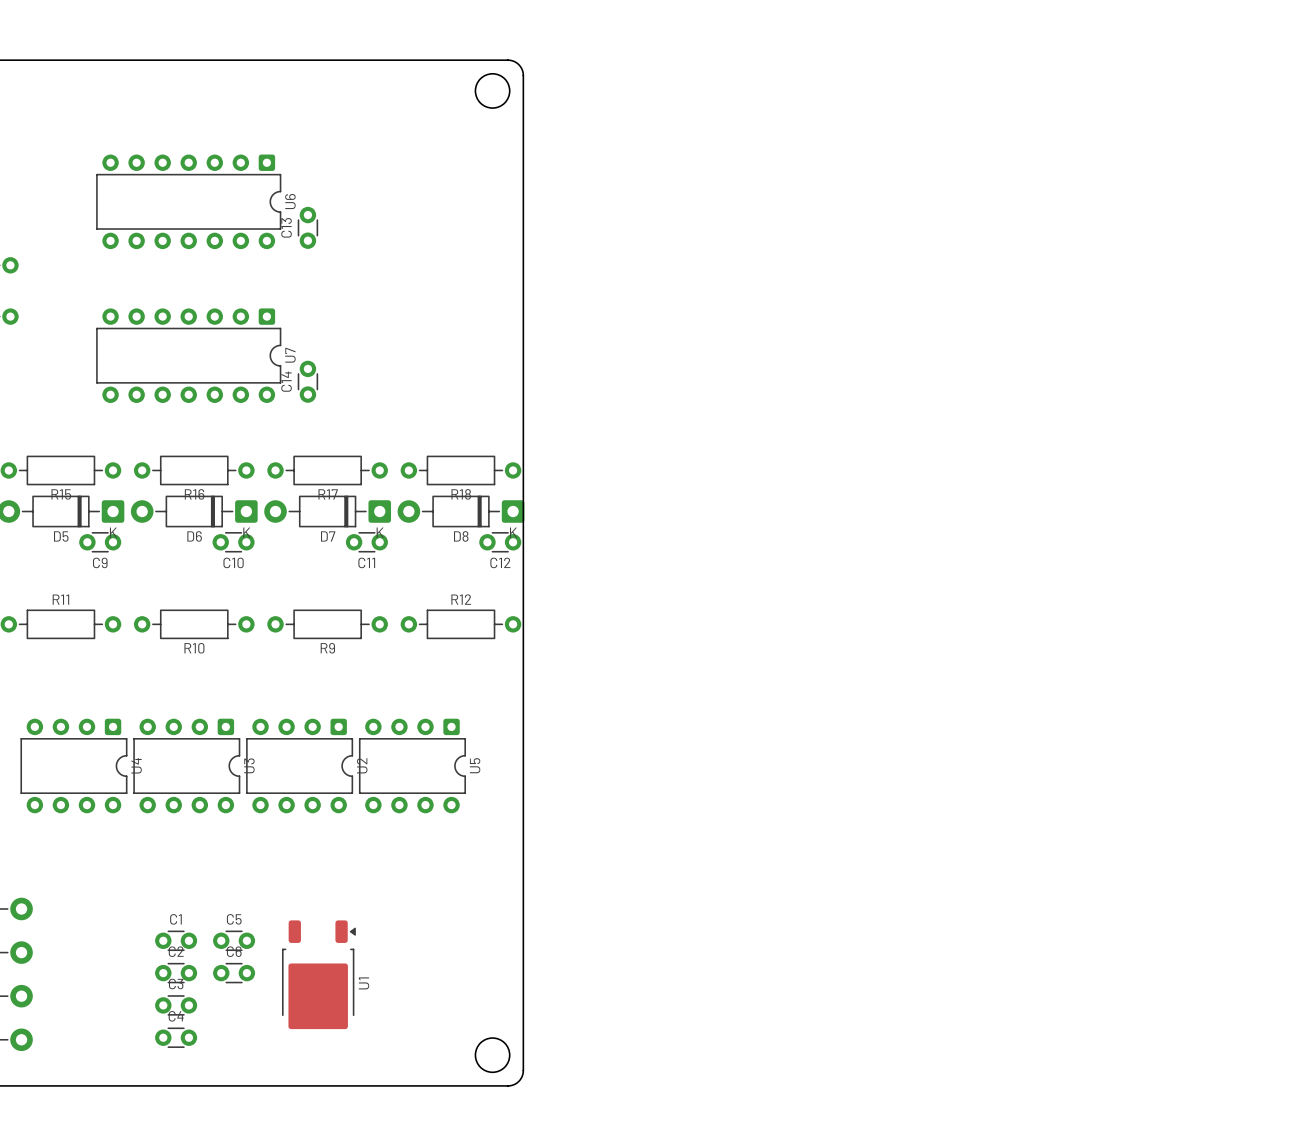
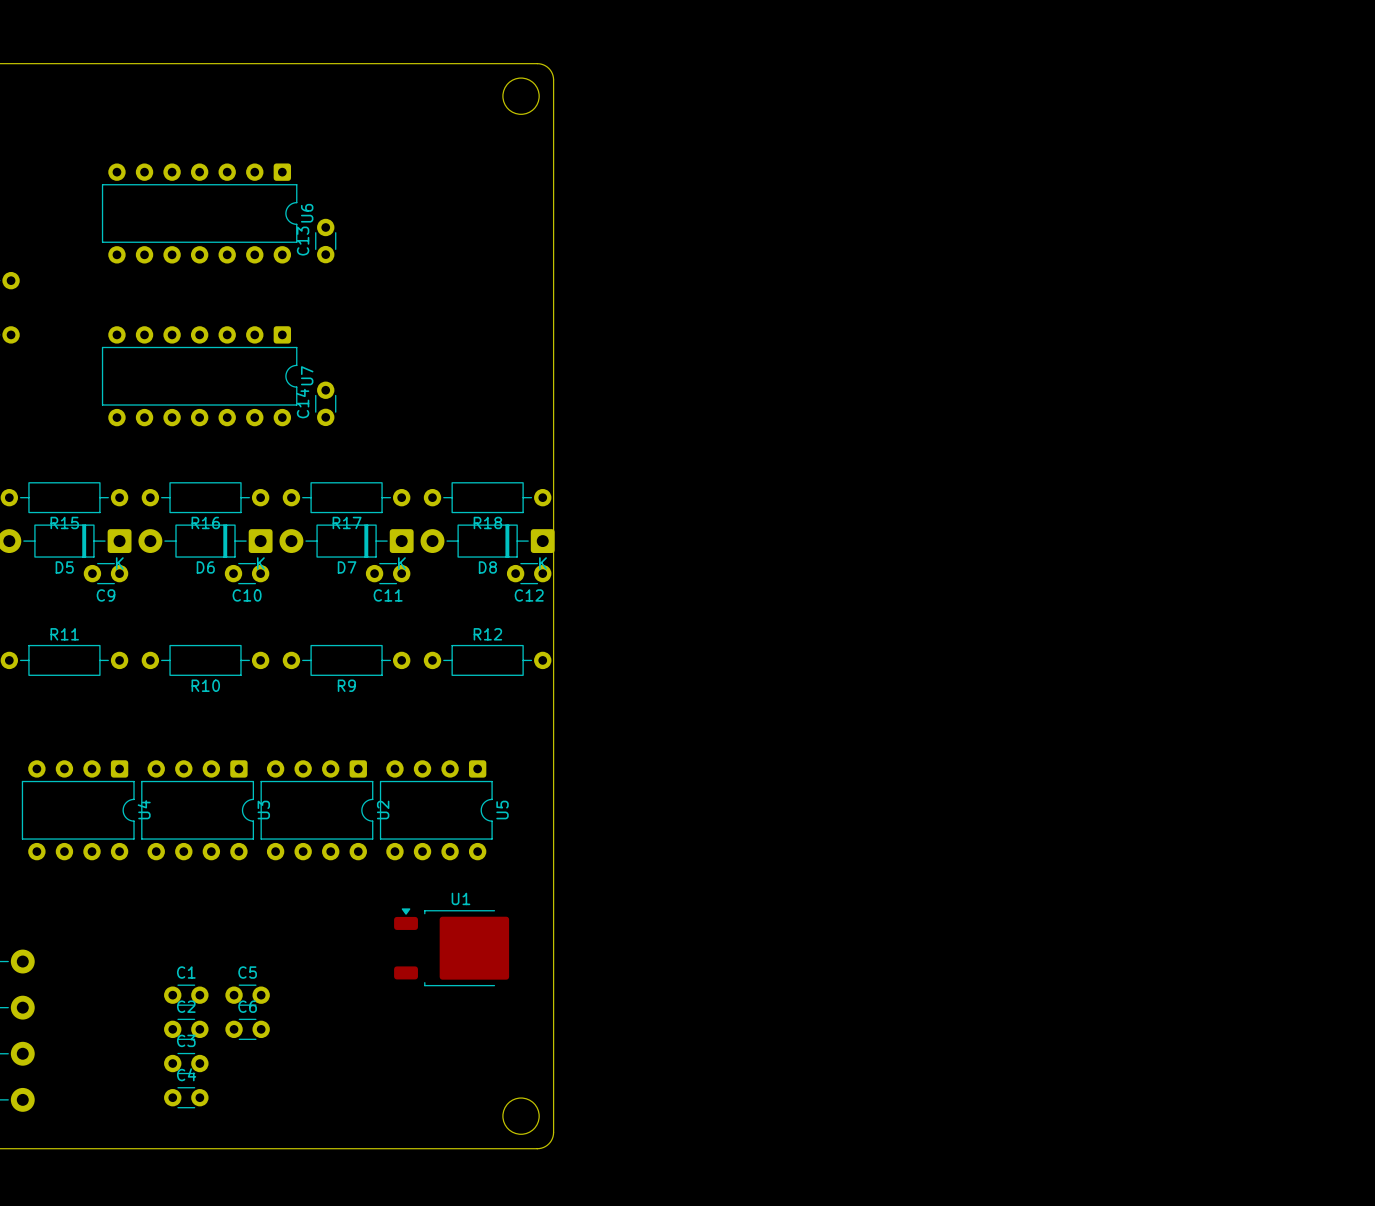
U1 rotation: 0° (319, 974) -> 90° counterclockwise (451, 947)
U1 position: (319, 974) -> (451, 947)

